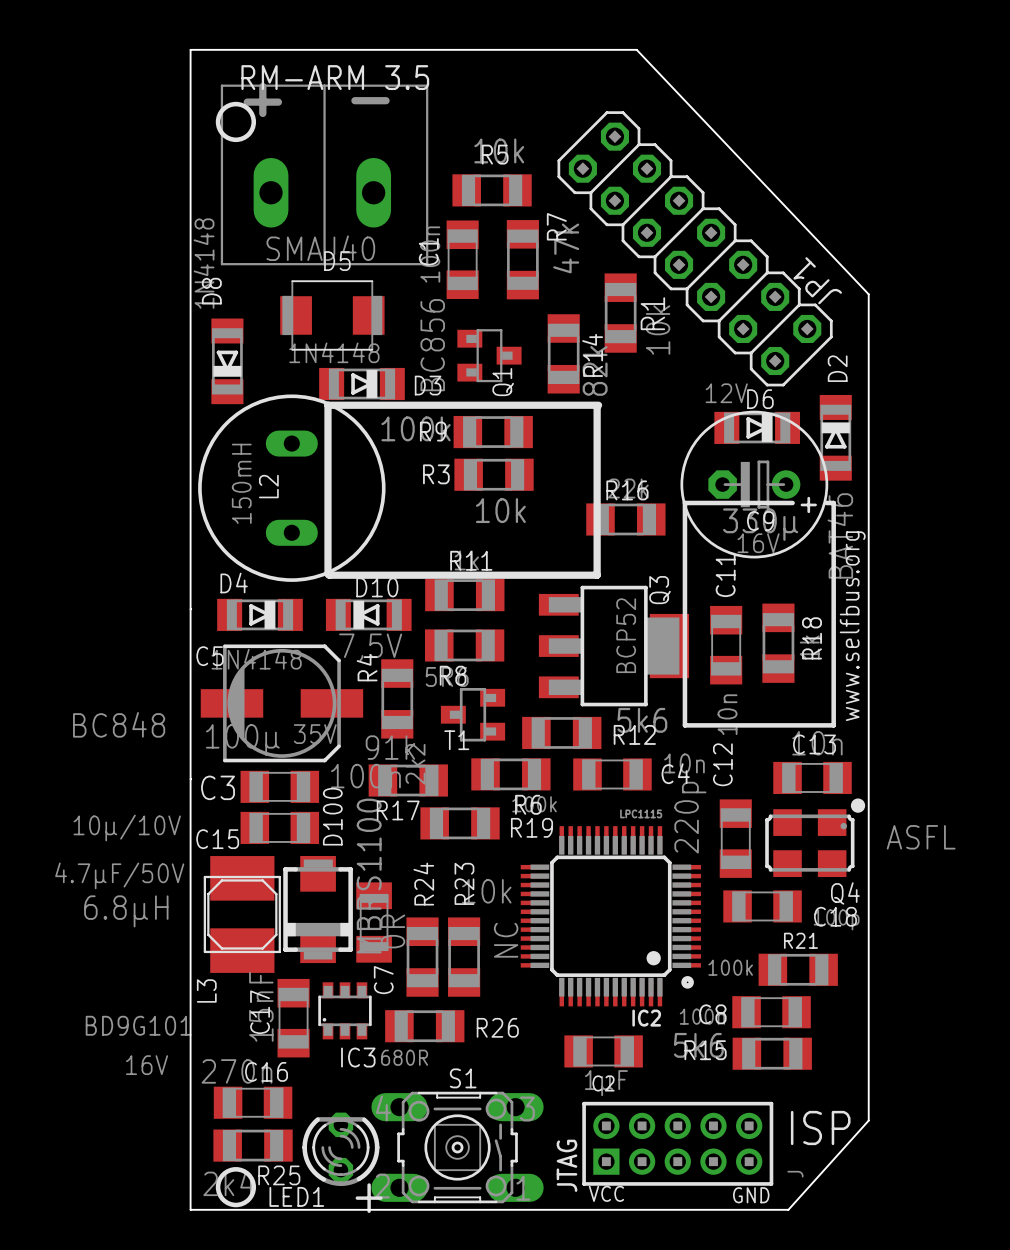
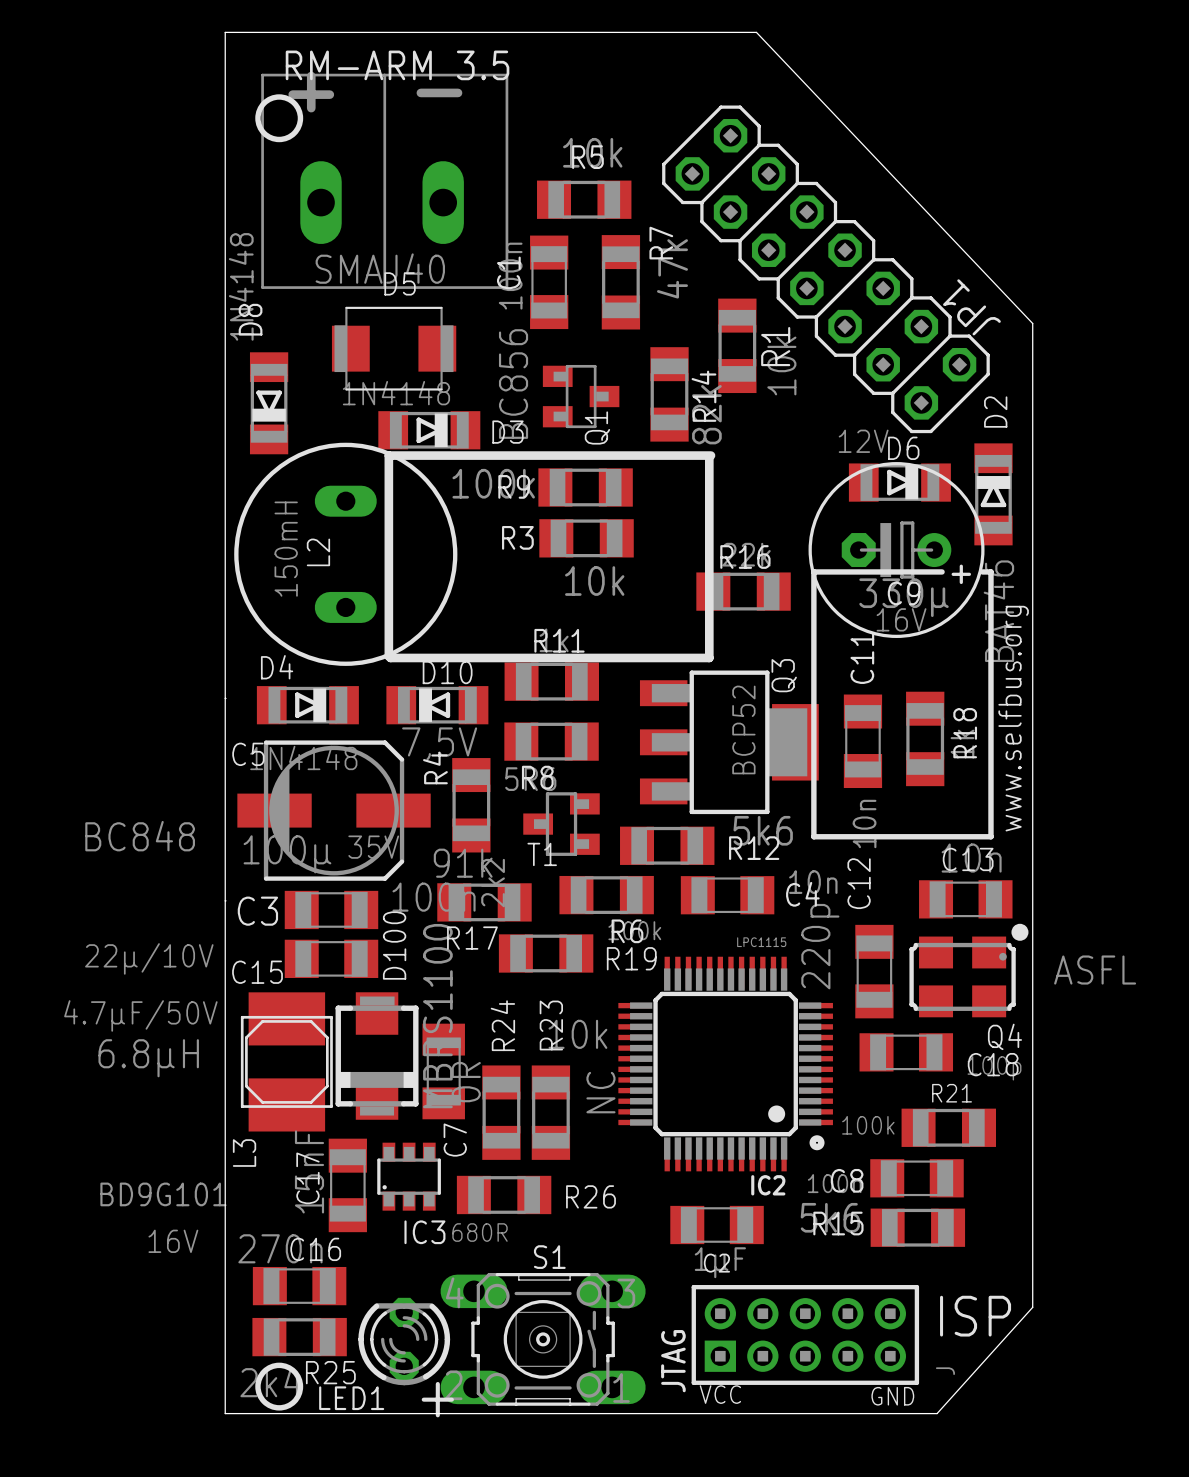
C15 value: 10µ/10V (127, 827) -> 22µ/10V (149, 958)

